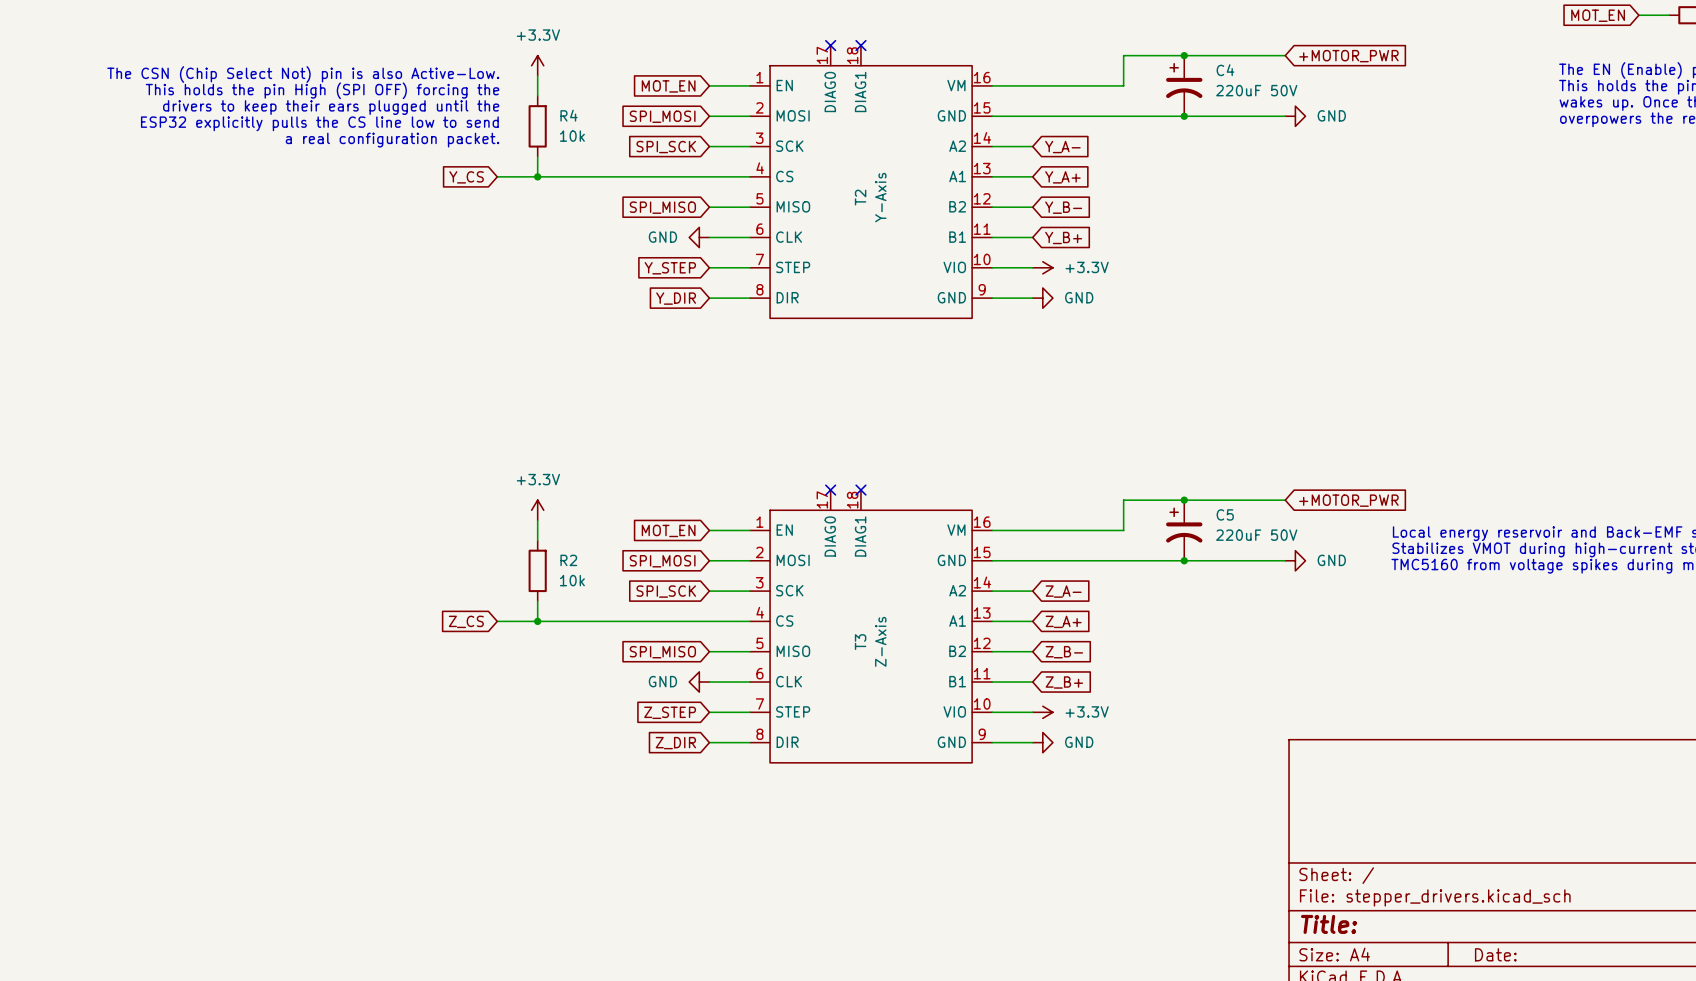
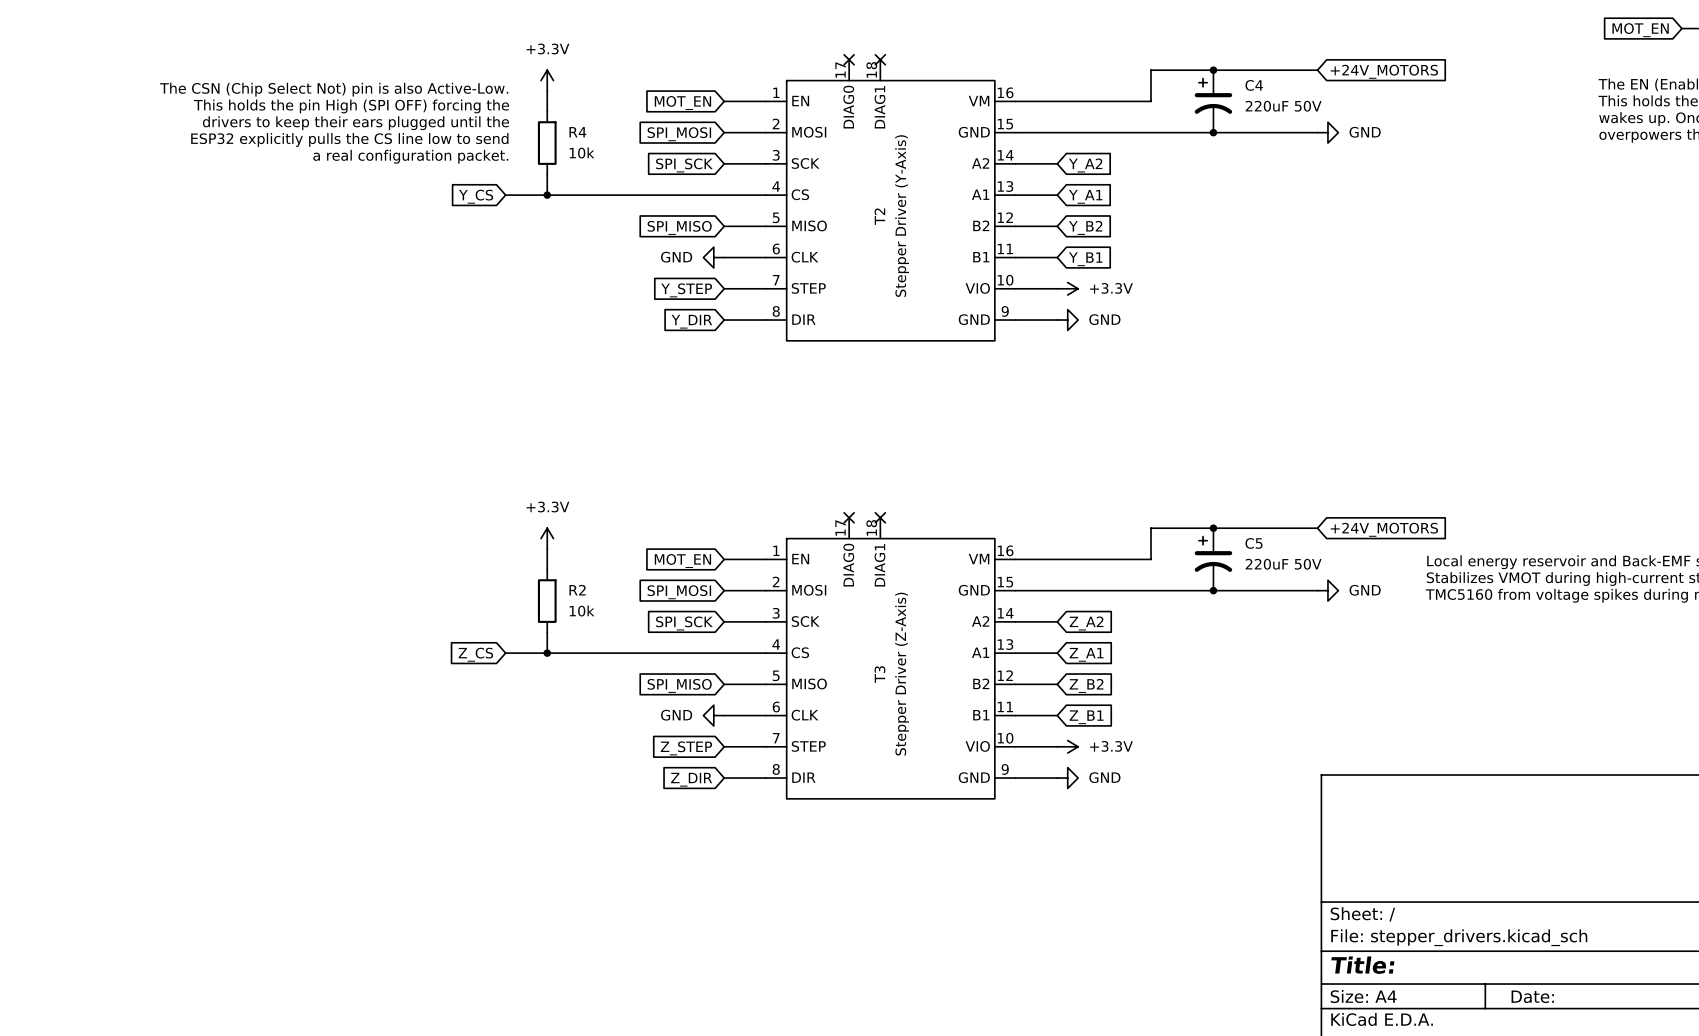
global label: +MOTOR_PWR (1348, 56) -> +24V_MOTORS (1384, 71)
global label: Y_A- (1062, 147) -> Y_A2 (1085, 165)
global label: Y_A+ (1062, 177) -> Y_A1 (1085, 196)
T2 value: Y-Axis (880, 197) -> Stepper Driver (Y-Axis) (902, 216)
global label: Y_B- (1063, 207) -> Y_B2 (1085, 227)
global label: Y_B+ (1063, 237) -> Y_B1 (1085, 259)
global label: +MOTOR_PWR (1348, 500) -> +24V_MOTORS (1384, 529)
global label: Z_A- (1063, 591) -> Z_A2 (1086, 623)
global label: Z_A+ (1063, 621) -> Z_A1 (1086, 654)
T3 value: Z-Axis (880, 641) -> Stepper Driver (Z-Axis) (902, 674)
global label: Z_B- (1064, 652) -> Z_B2 (1086, 685)
global label: Z_B+ (1064, 682) -> Z_B1 (1086, 717)

